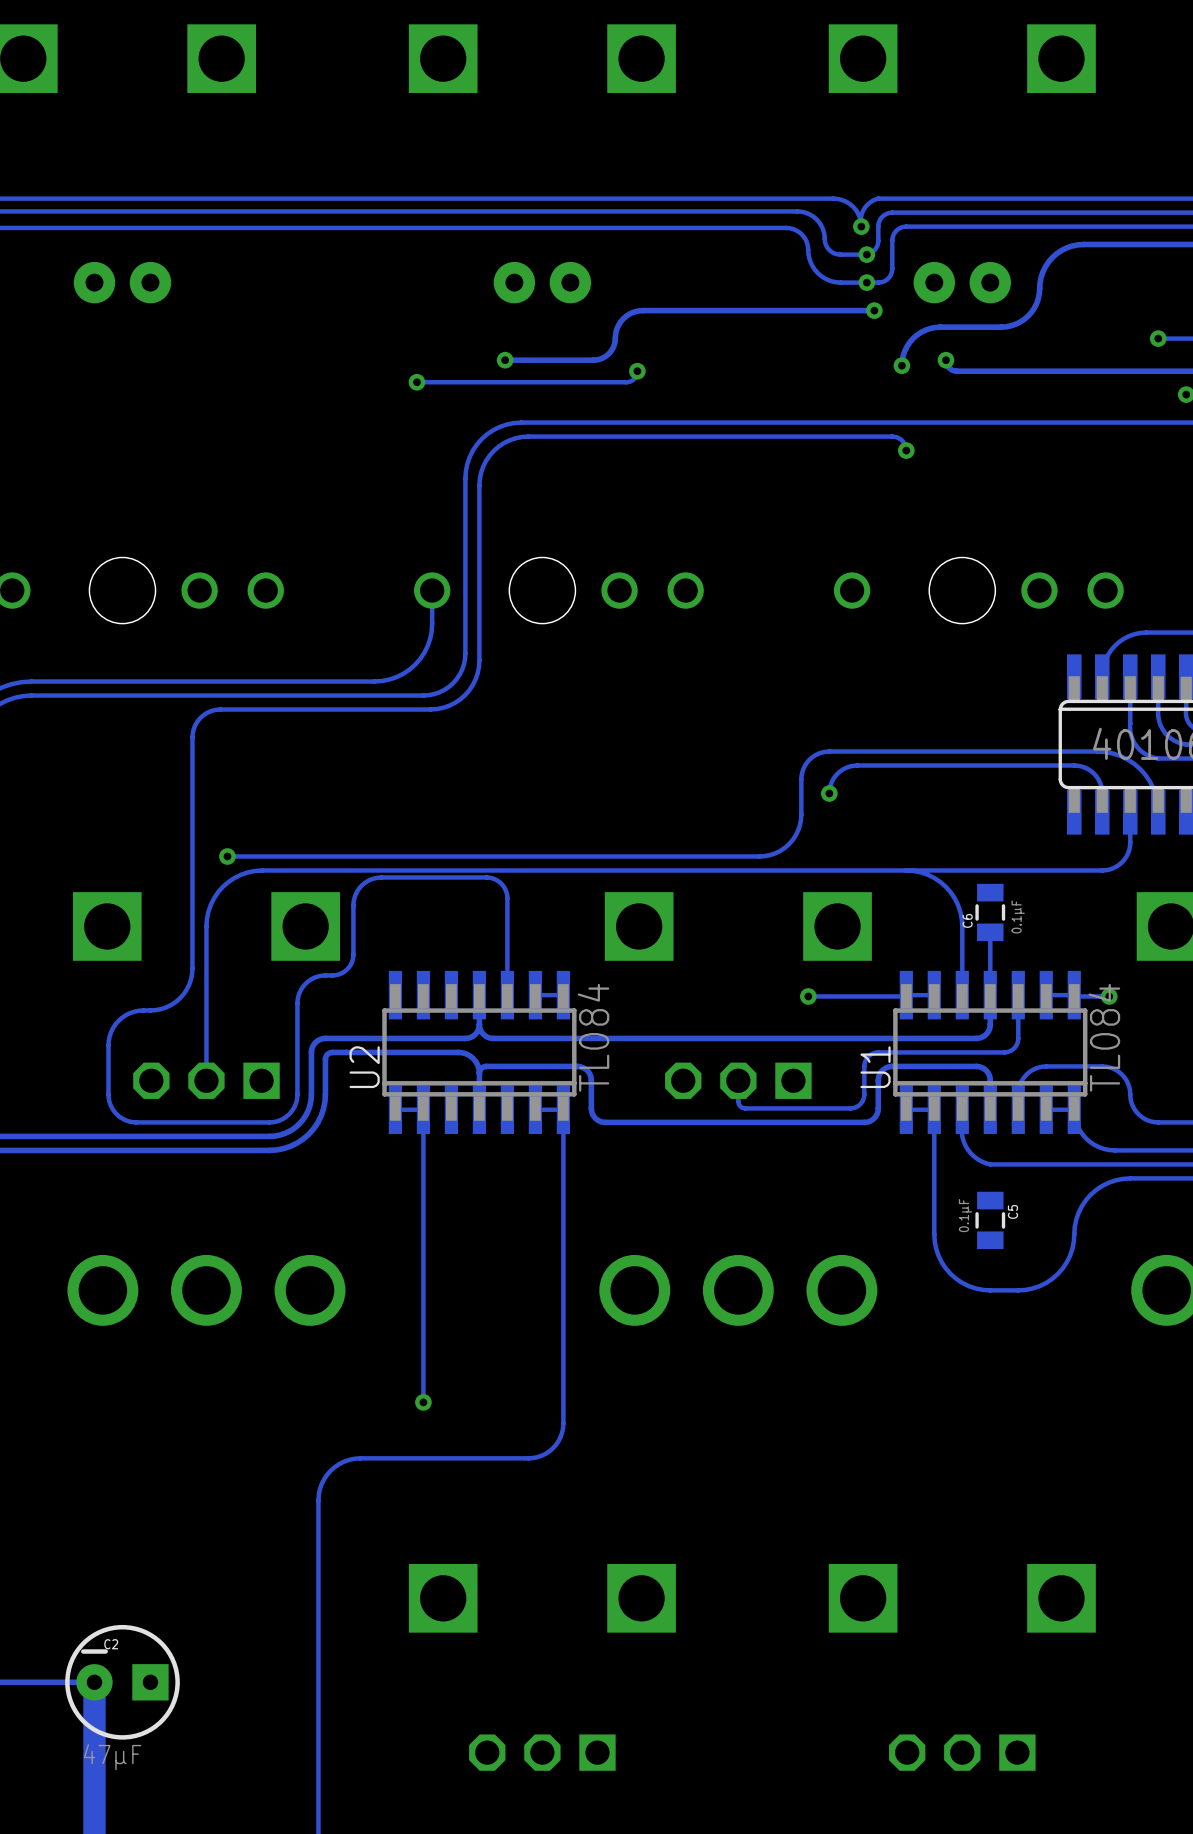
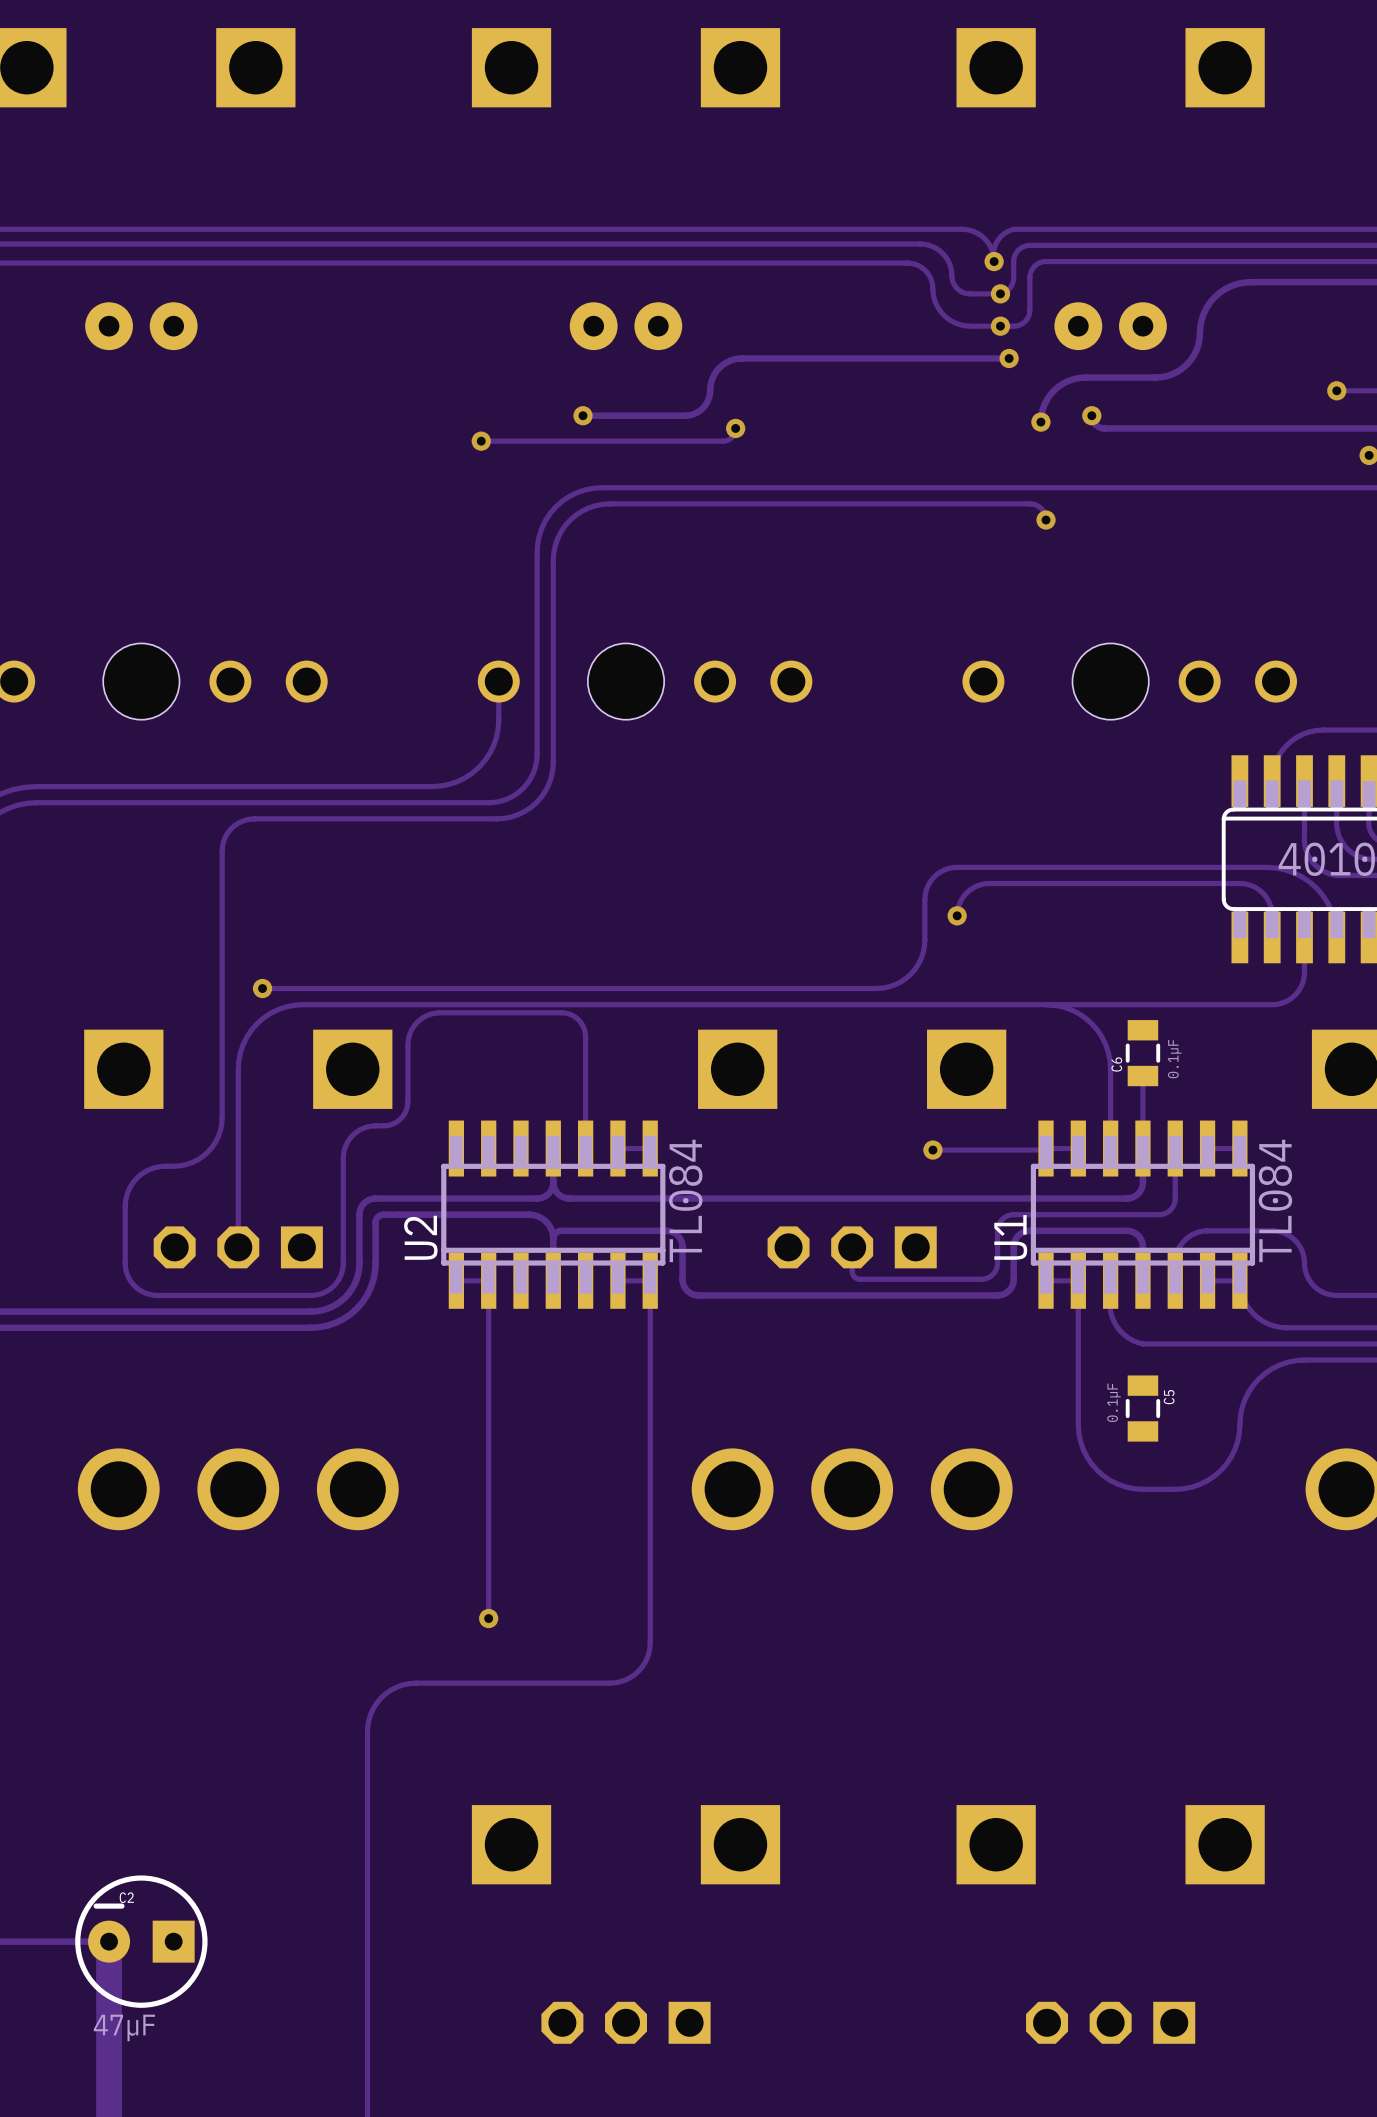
track: (1074, 995) (1109, 996) -> none
via: (1109, 996) -> none

